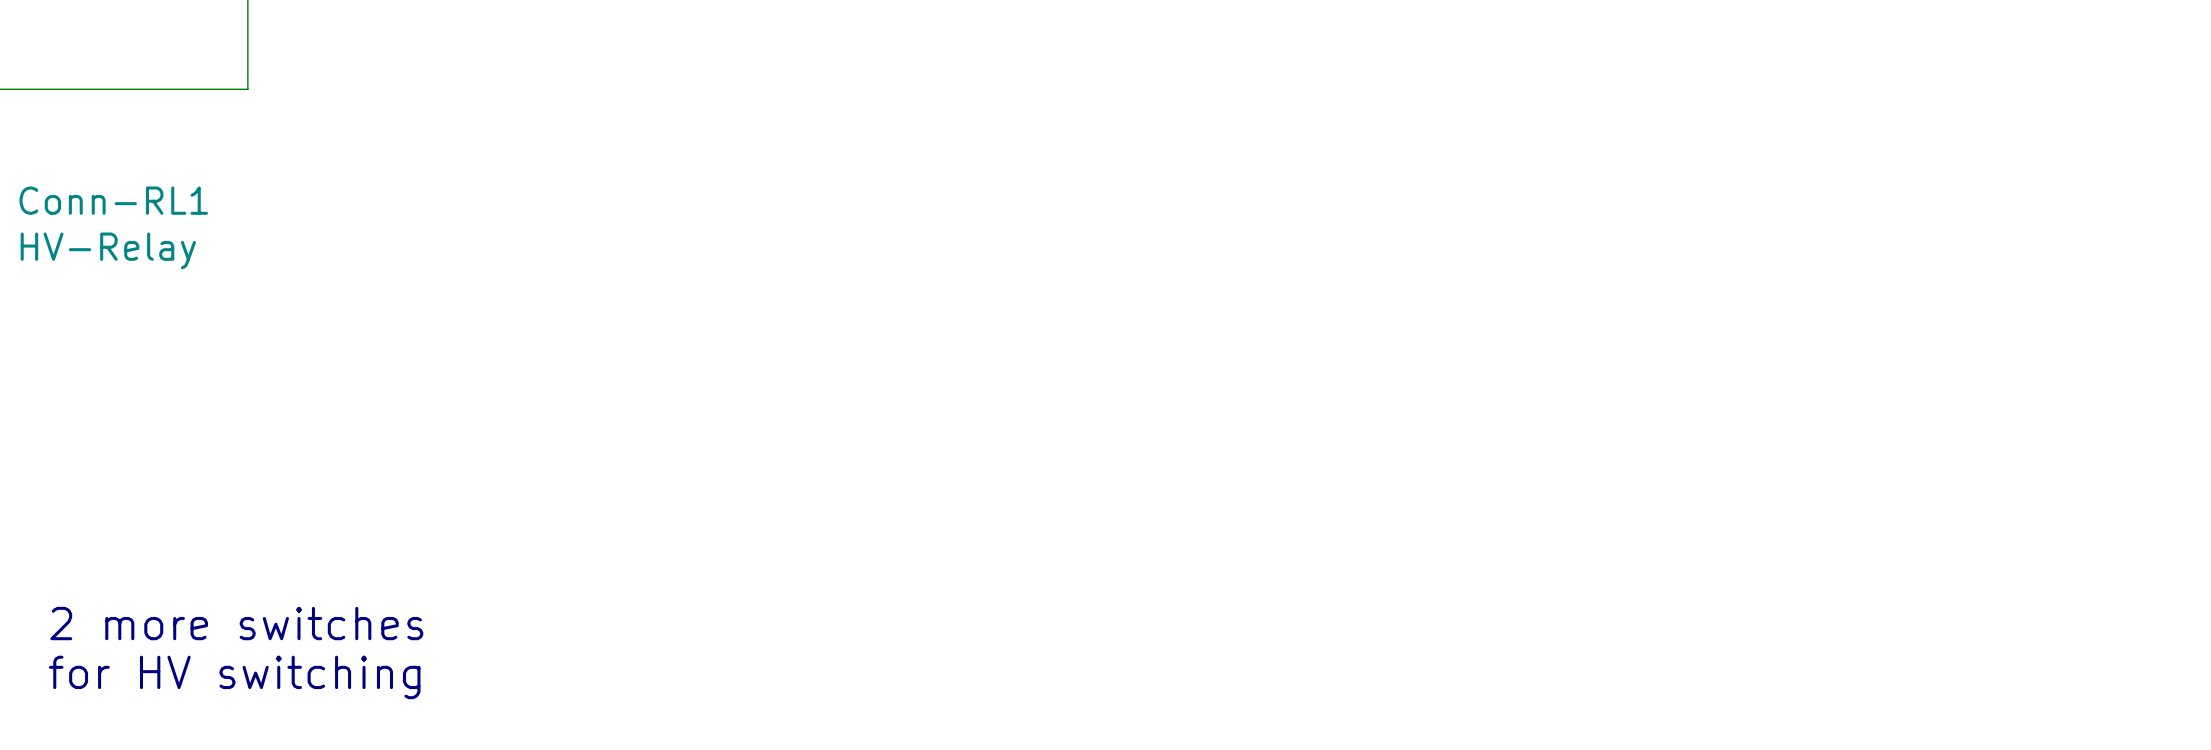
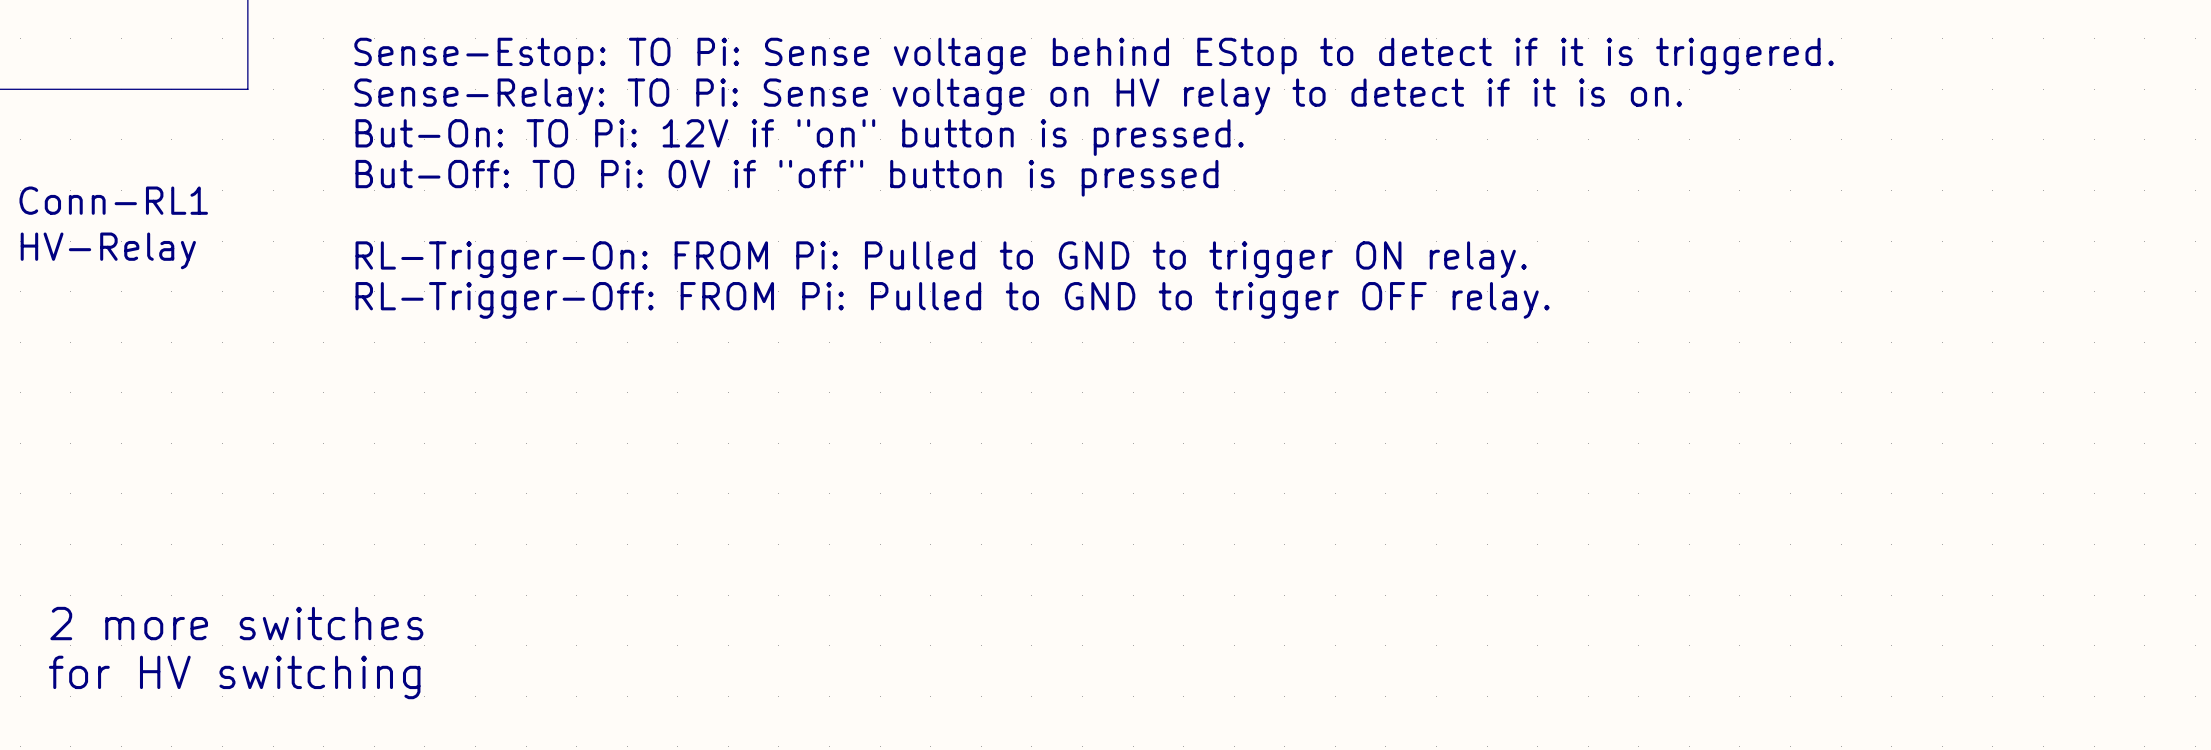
text: none -> Sense-Estop: TO Pi: Sense voltage behind EStop to detect if it is triggered. (1094, 56)
text: none -> Sense-Relay: TO Pi: Sense voltage on HV relay to detect if it is on. (1018, 96)
text: none -> But-On: TO Pi: 12V if "on" button is pressed. (799, 137)
text: none -> But-Off: TO Pi: 0V if "off" button is pressed (786, 178)
text: none -> RL-Trigger-On: FROM Pi: Pulled to GND to trigger ON relay. (941, 259)
text: none -> RL-Trigger-Off: FROM Pi: Pulled to GND to trigger OFF relay. (952, 300)

